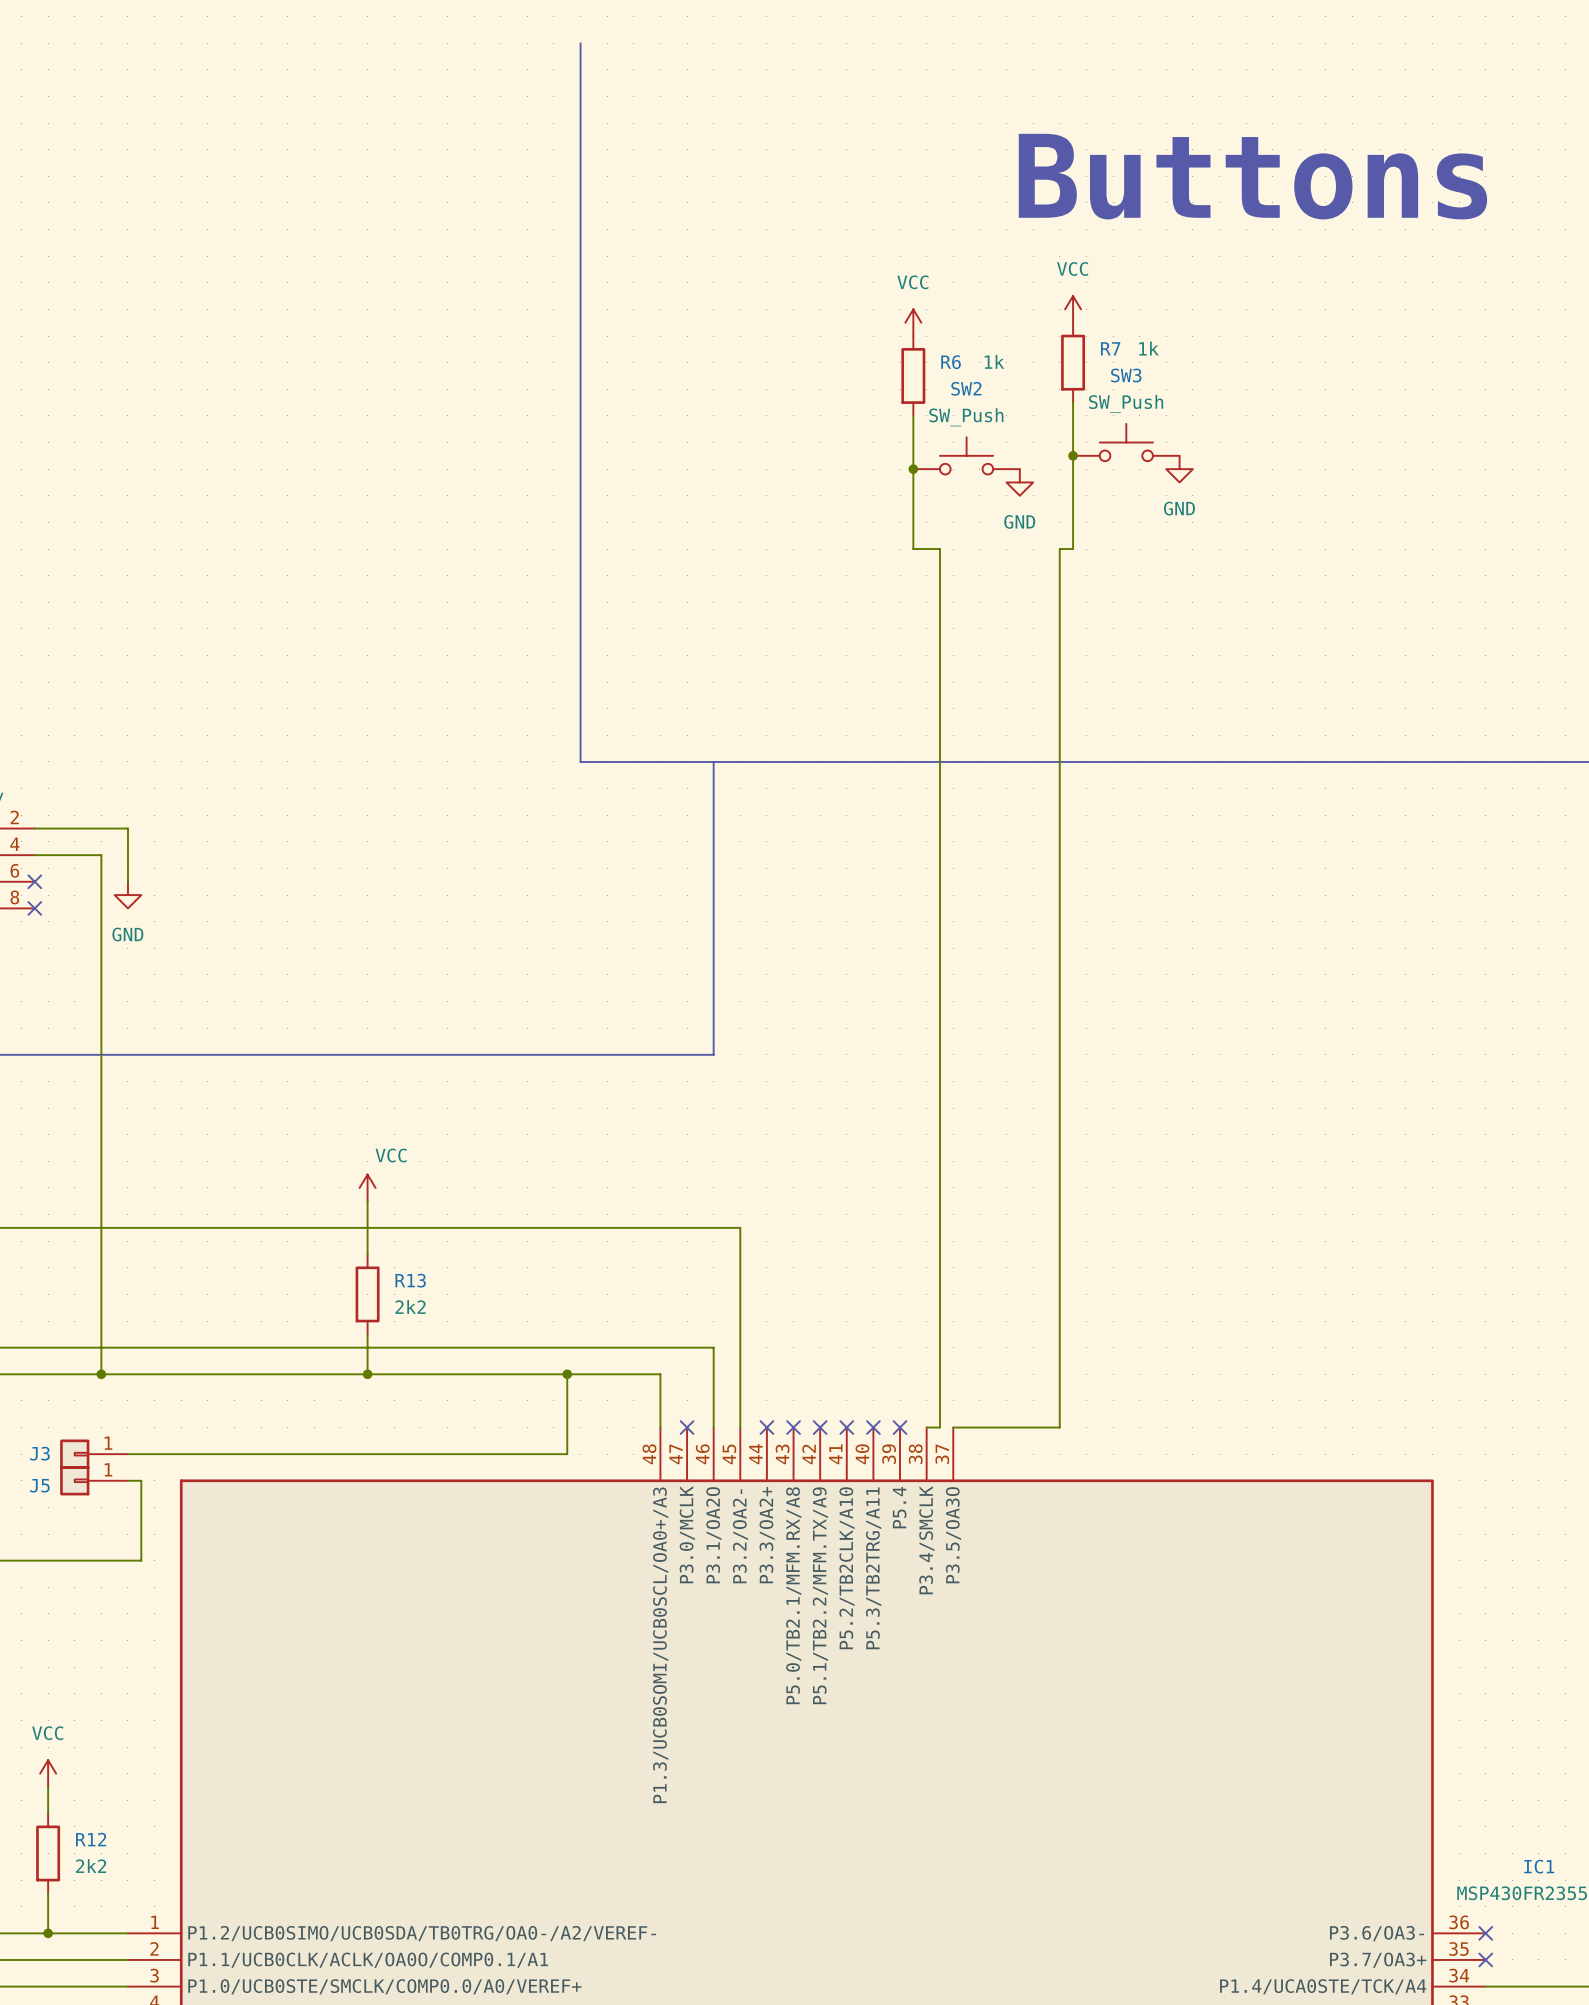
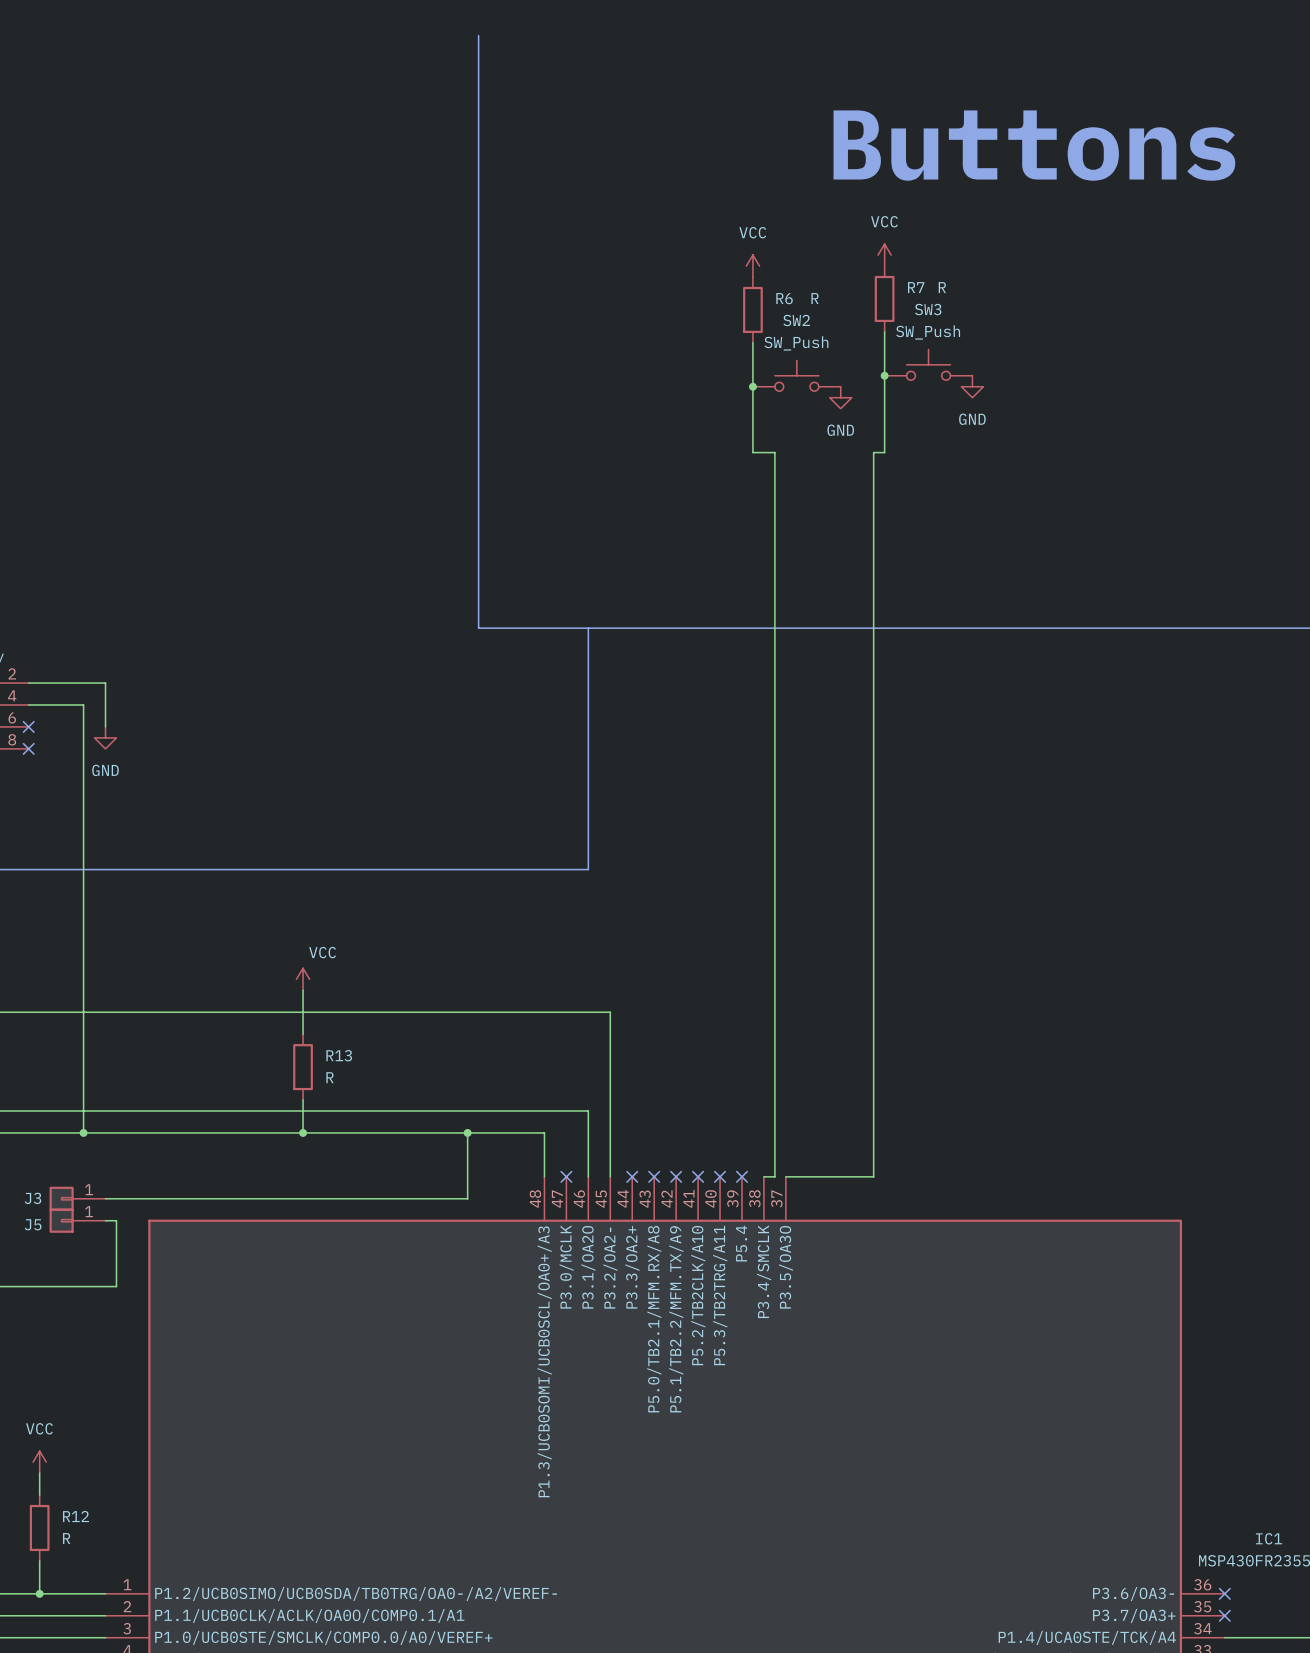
R7 value: 1k (1148, 348) -> R (942, 287)
R6 value: 1k (994, 361) -> R (815, 298)
R13 value: 2k2 (410, 1306) -> R (330, 1077)
R12 value: 2k2 (91, 1866) -> R (66, 1538)

